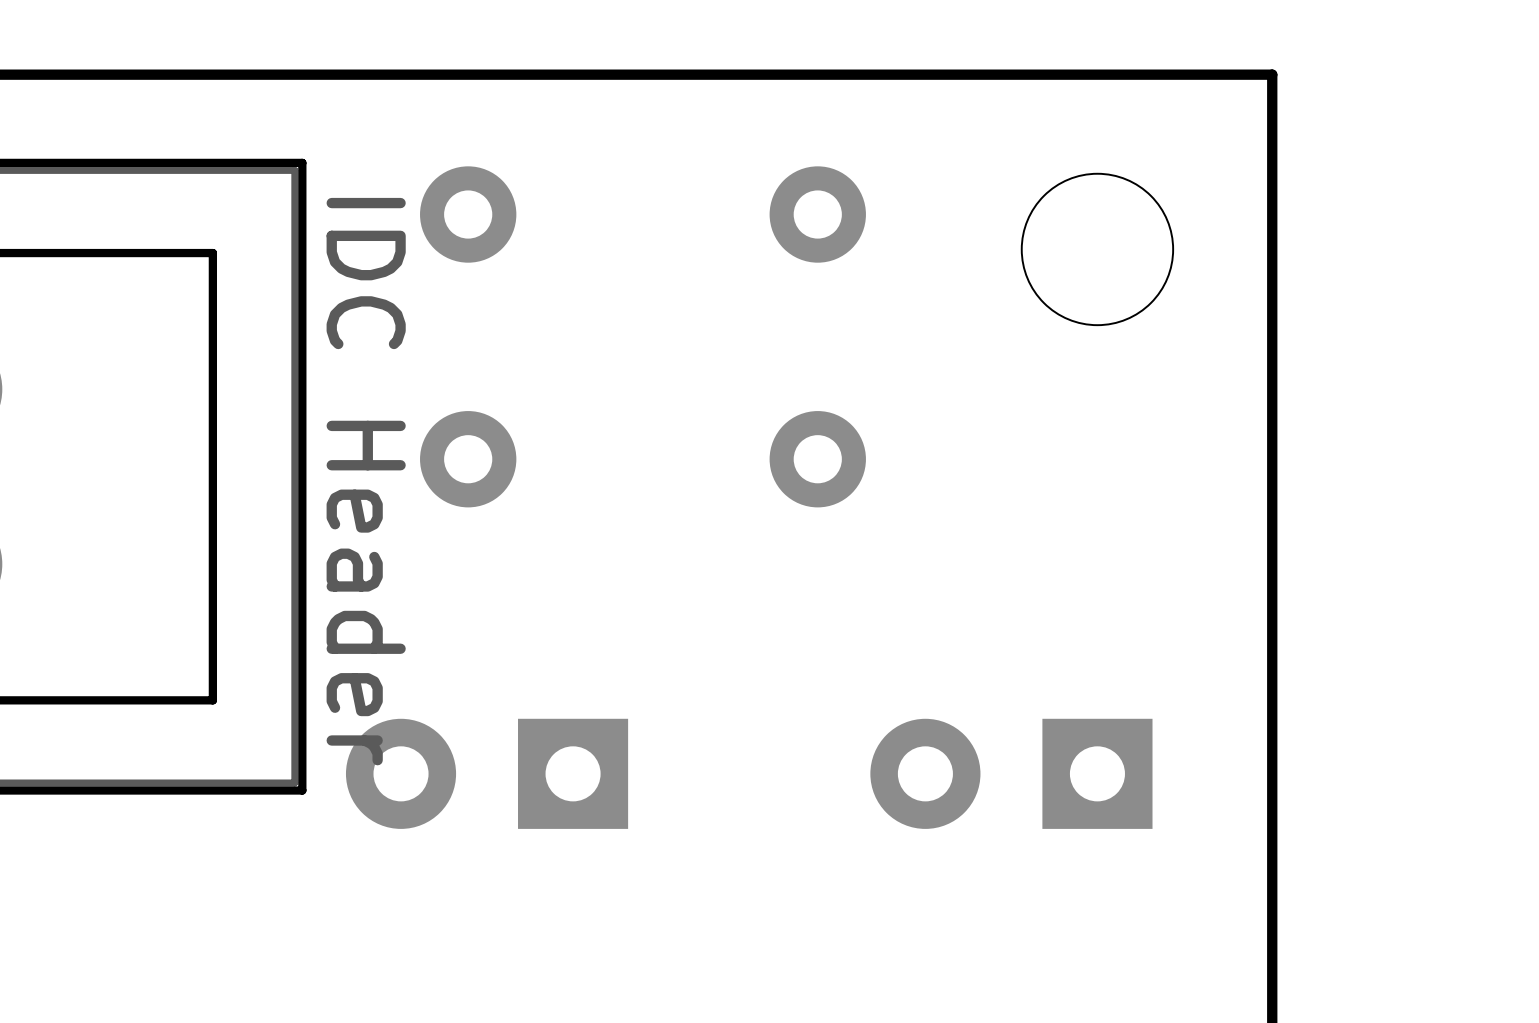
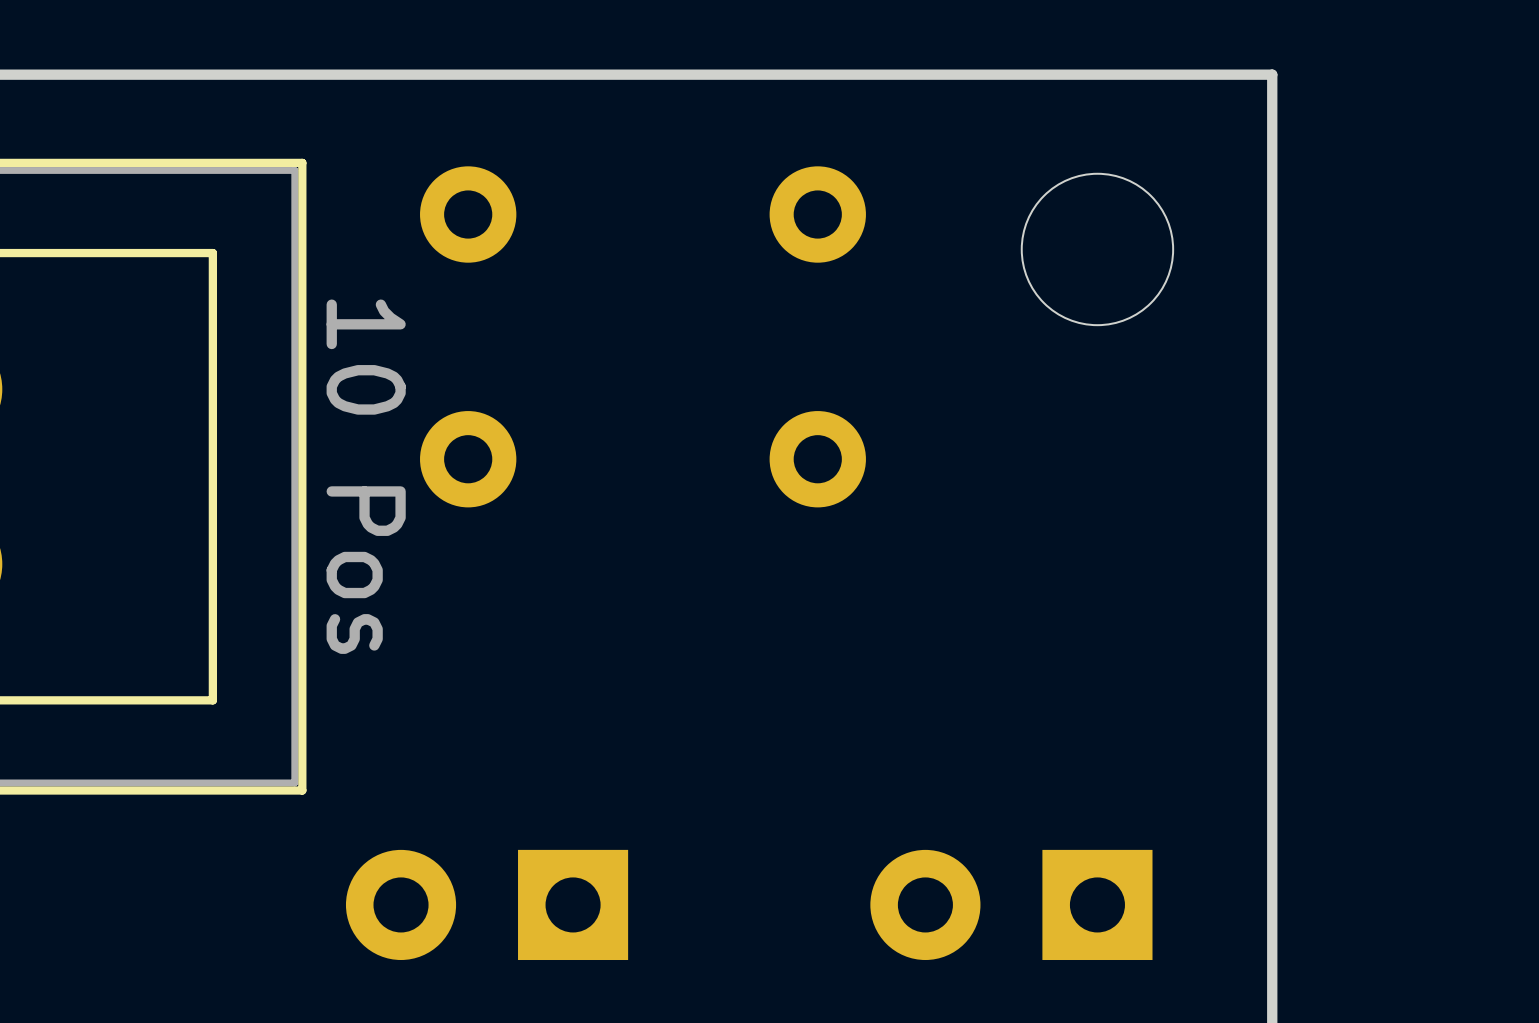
part value: IDC Header (366, 481) -> 10 Pos (366, 476)
part position: (487, 773) -> (487, 904)
part position: (1011, 773) -> (1011, 904)

